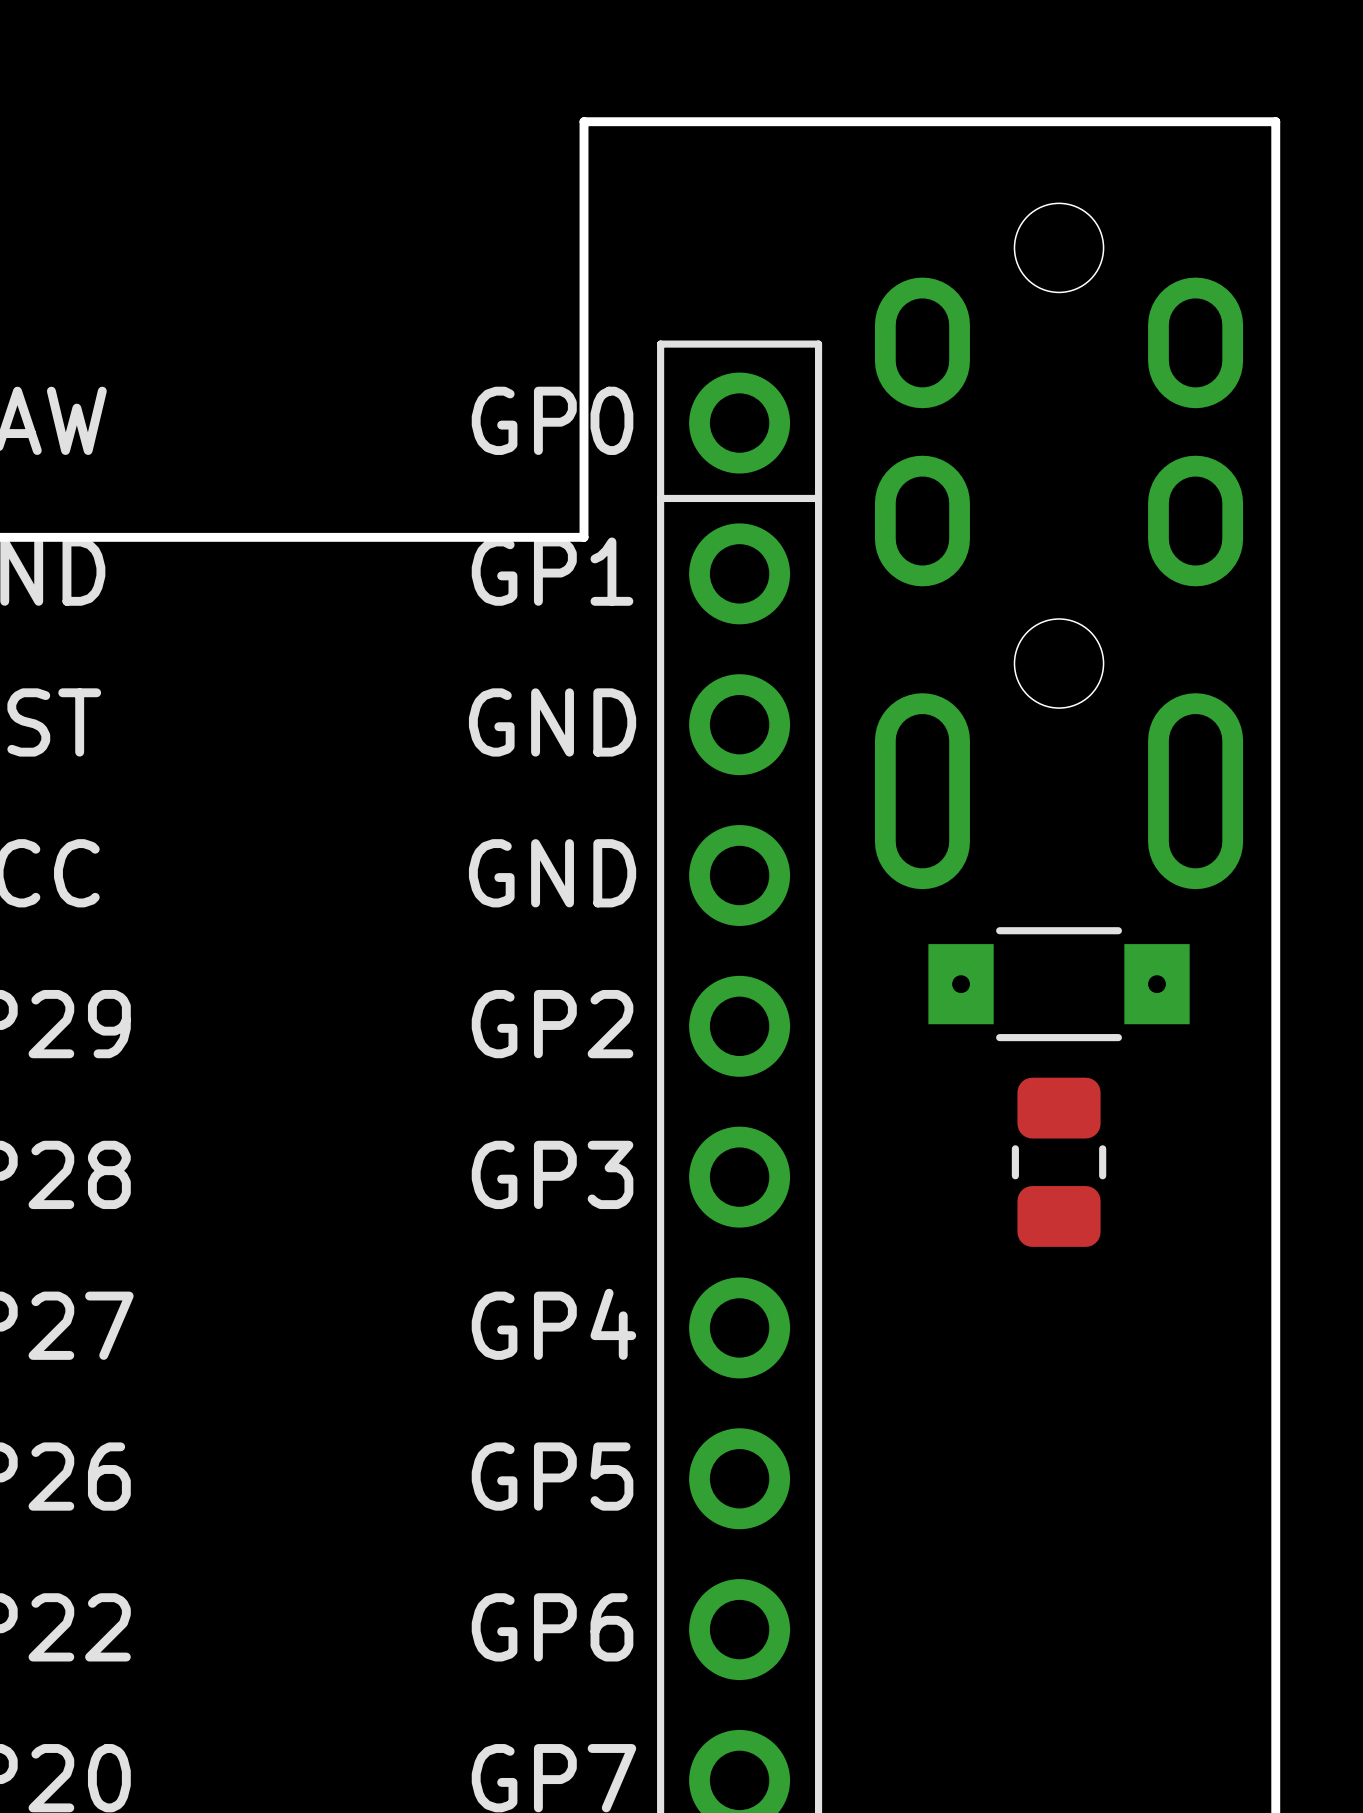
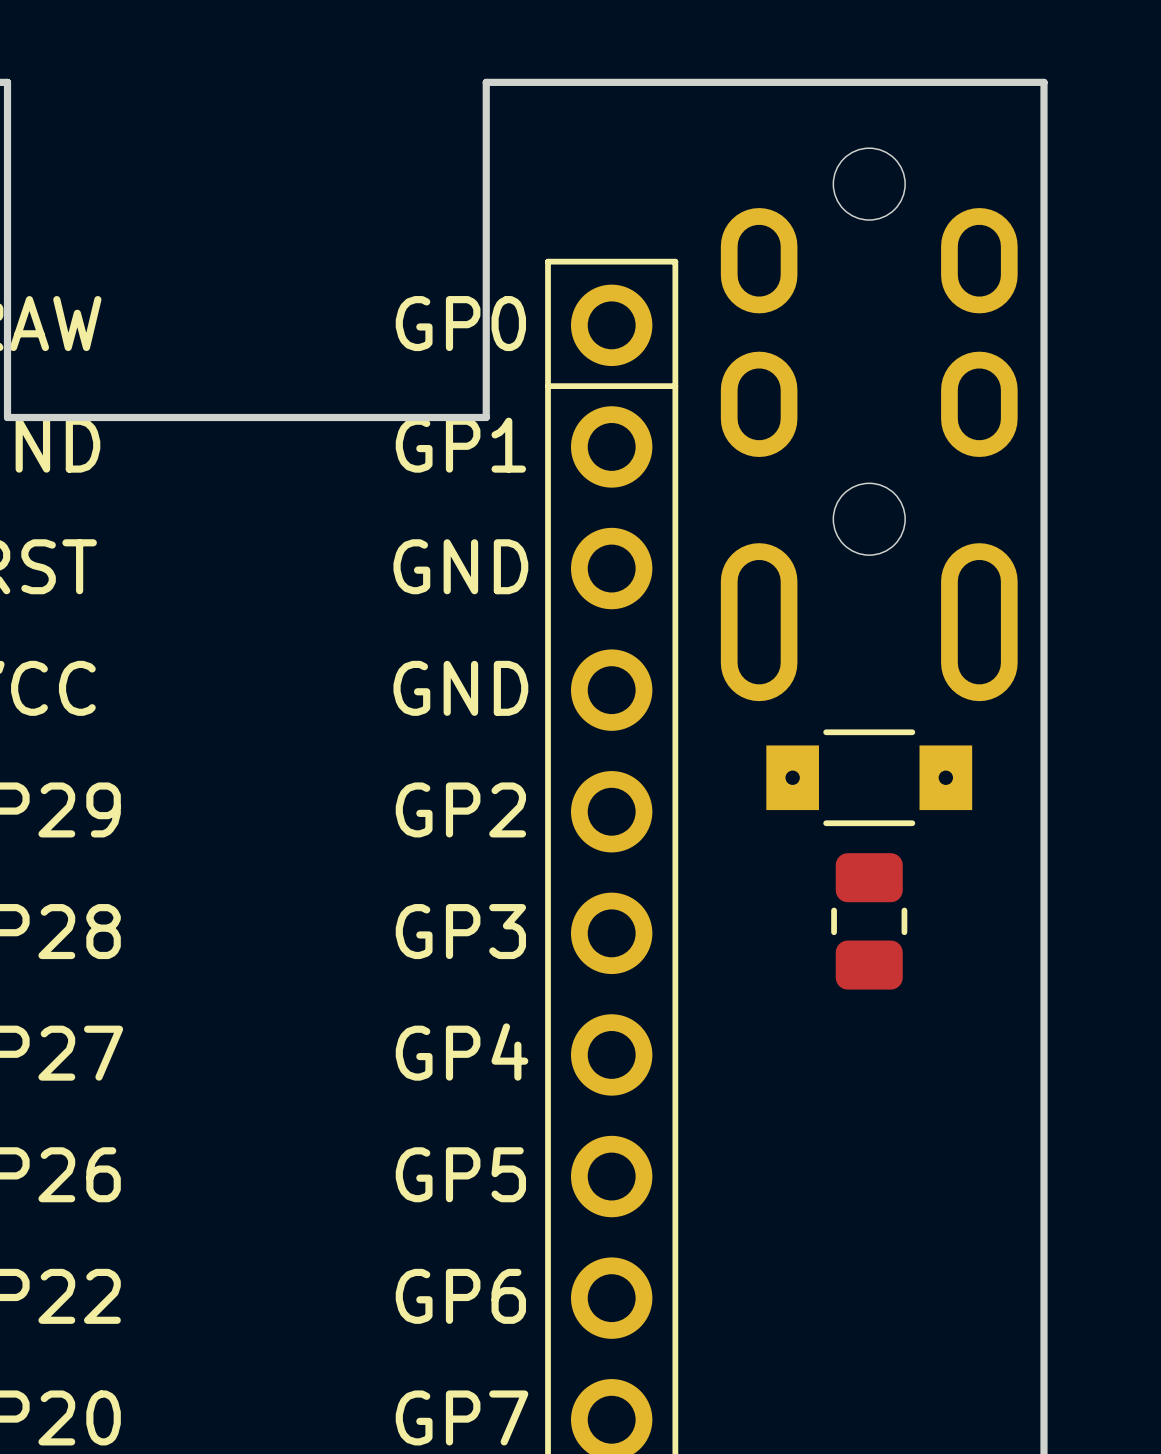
part footprint: [928, 927, 1190, 1042] -> [766, 729, 973, 827]

